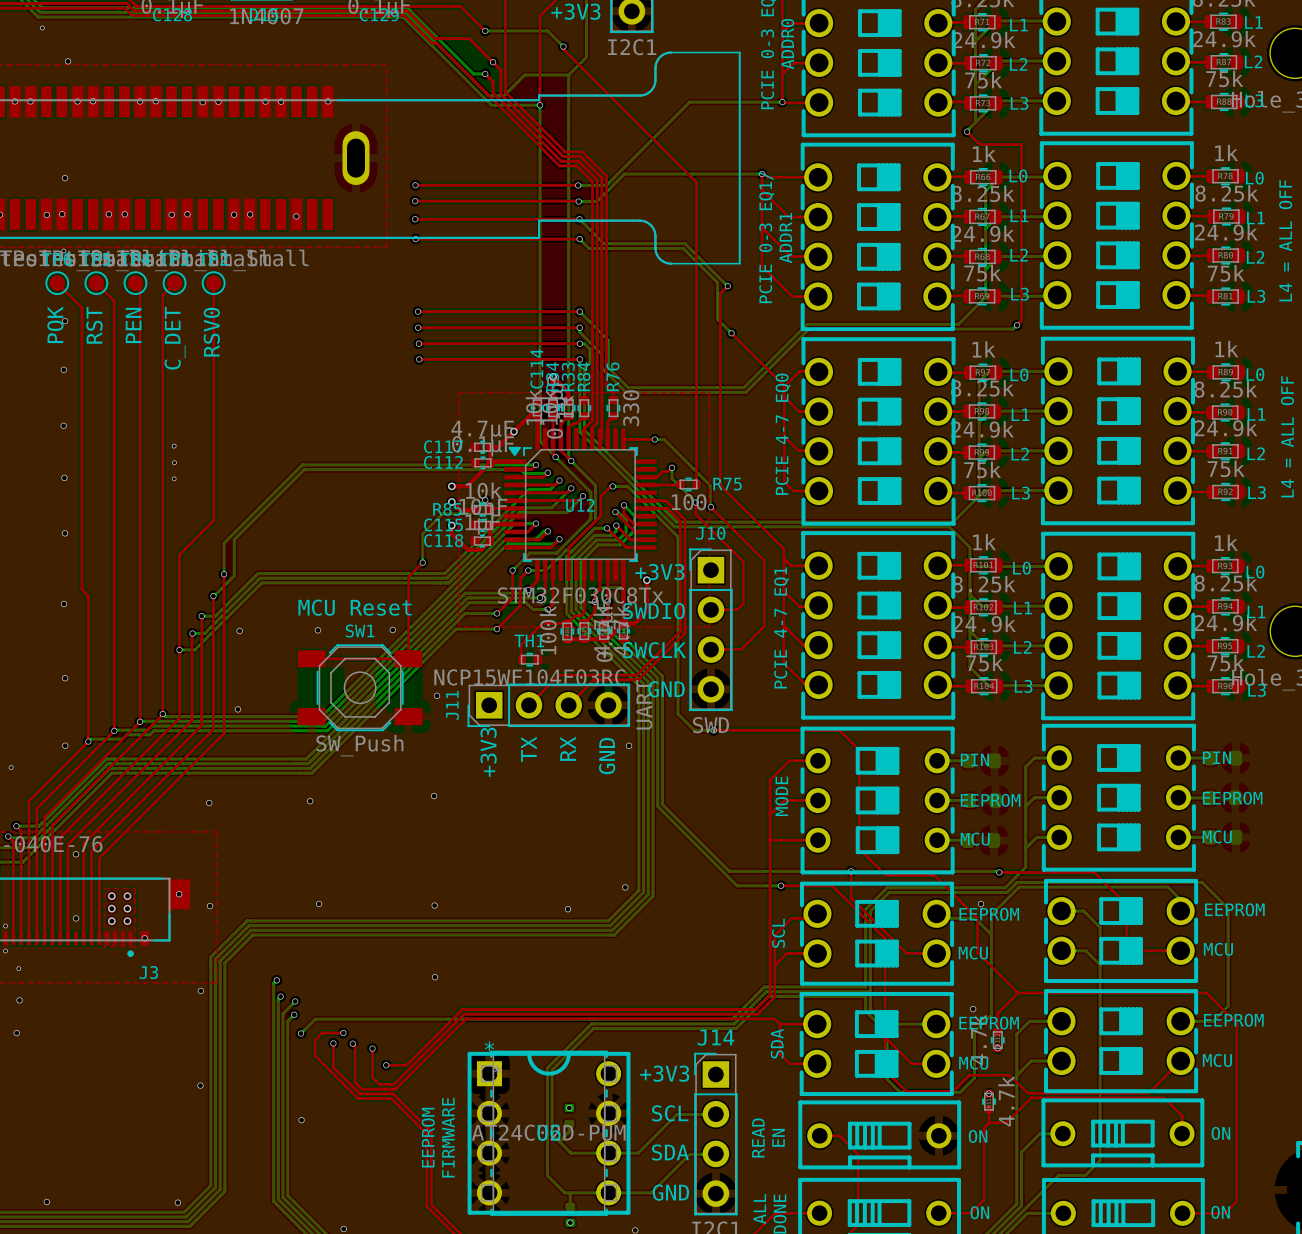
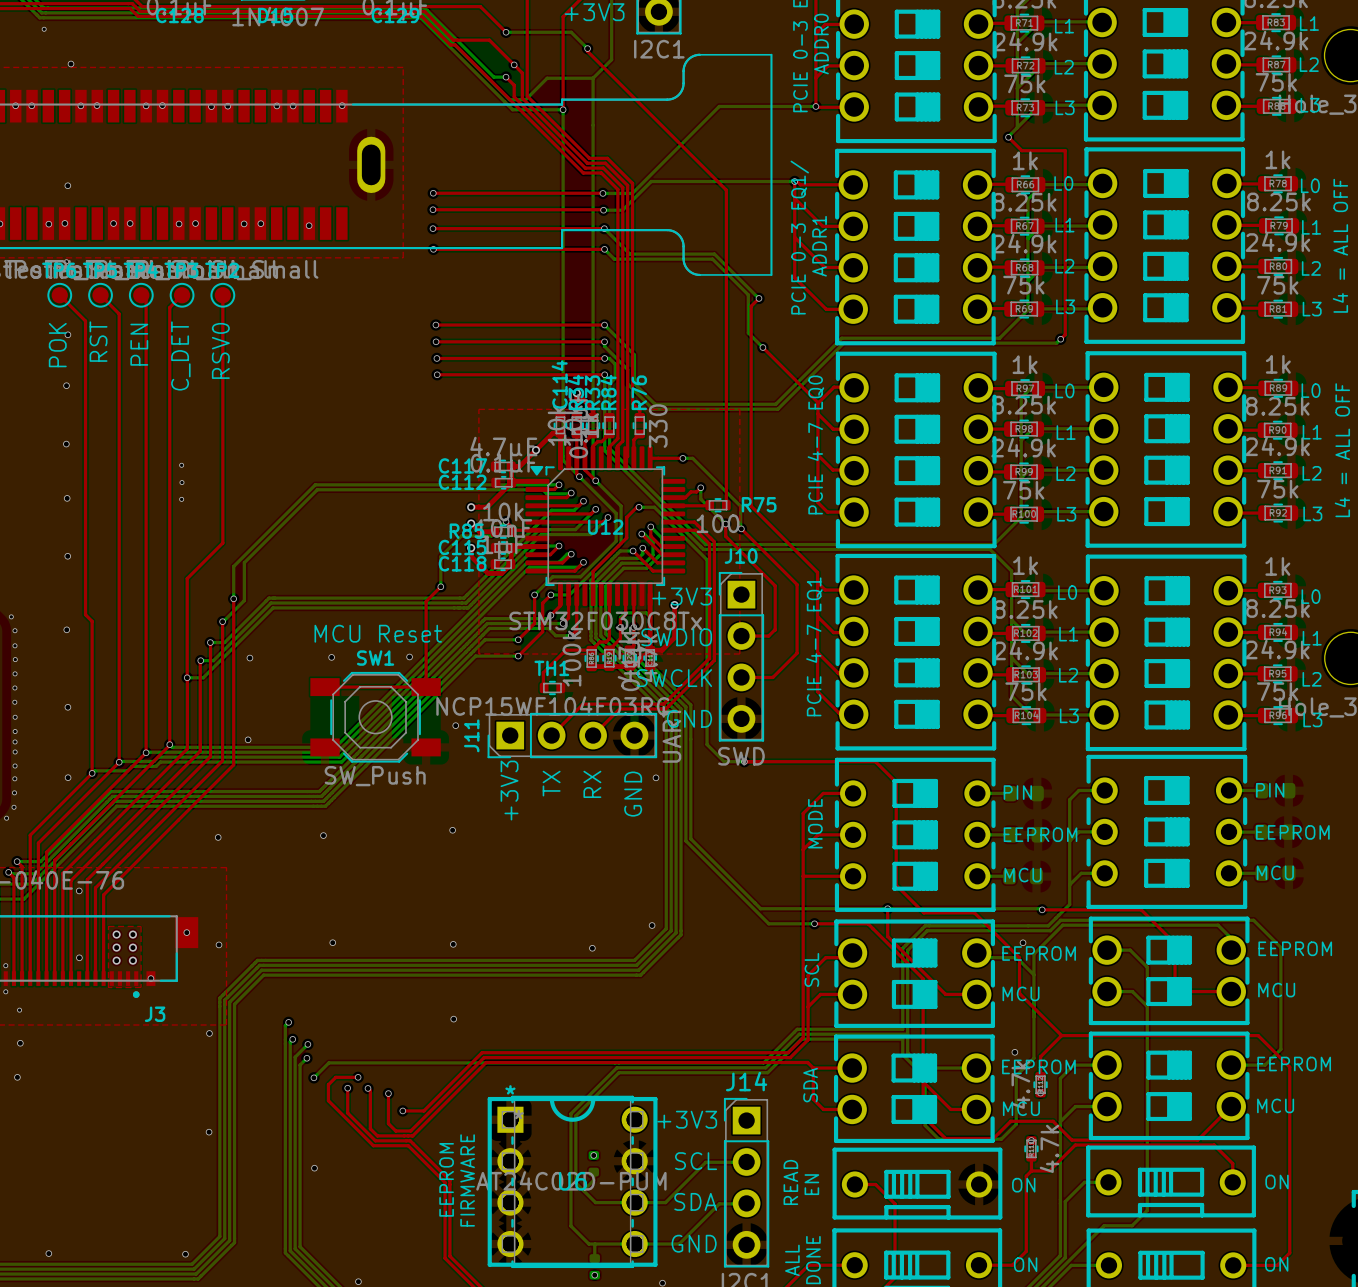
via: none -> (11, 616)
via: none -> (14, 630)
via: none -> (14, 645)
via: none -> (15, 659)
via: none -> (15, 673)
via: none -> (14, 687)
via: none -> (14, 702)
via: none -> (15, 717)
via: none -> (15, 731)
via: none -> (15, 741)
via: none -> (15, 751)
via: none -> (15, 766)
via: none -> (14, 778)
via: none -> (14, 792)
via: (11, 767) -> none
via: none -> (14, 807)
via: none -> (6, 818)

